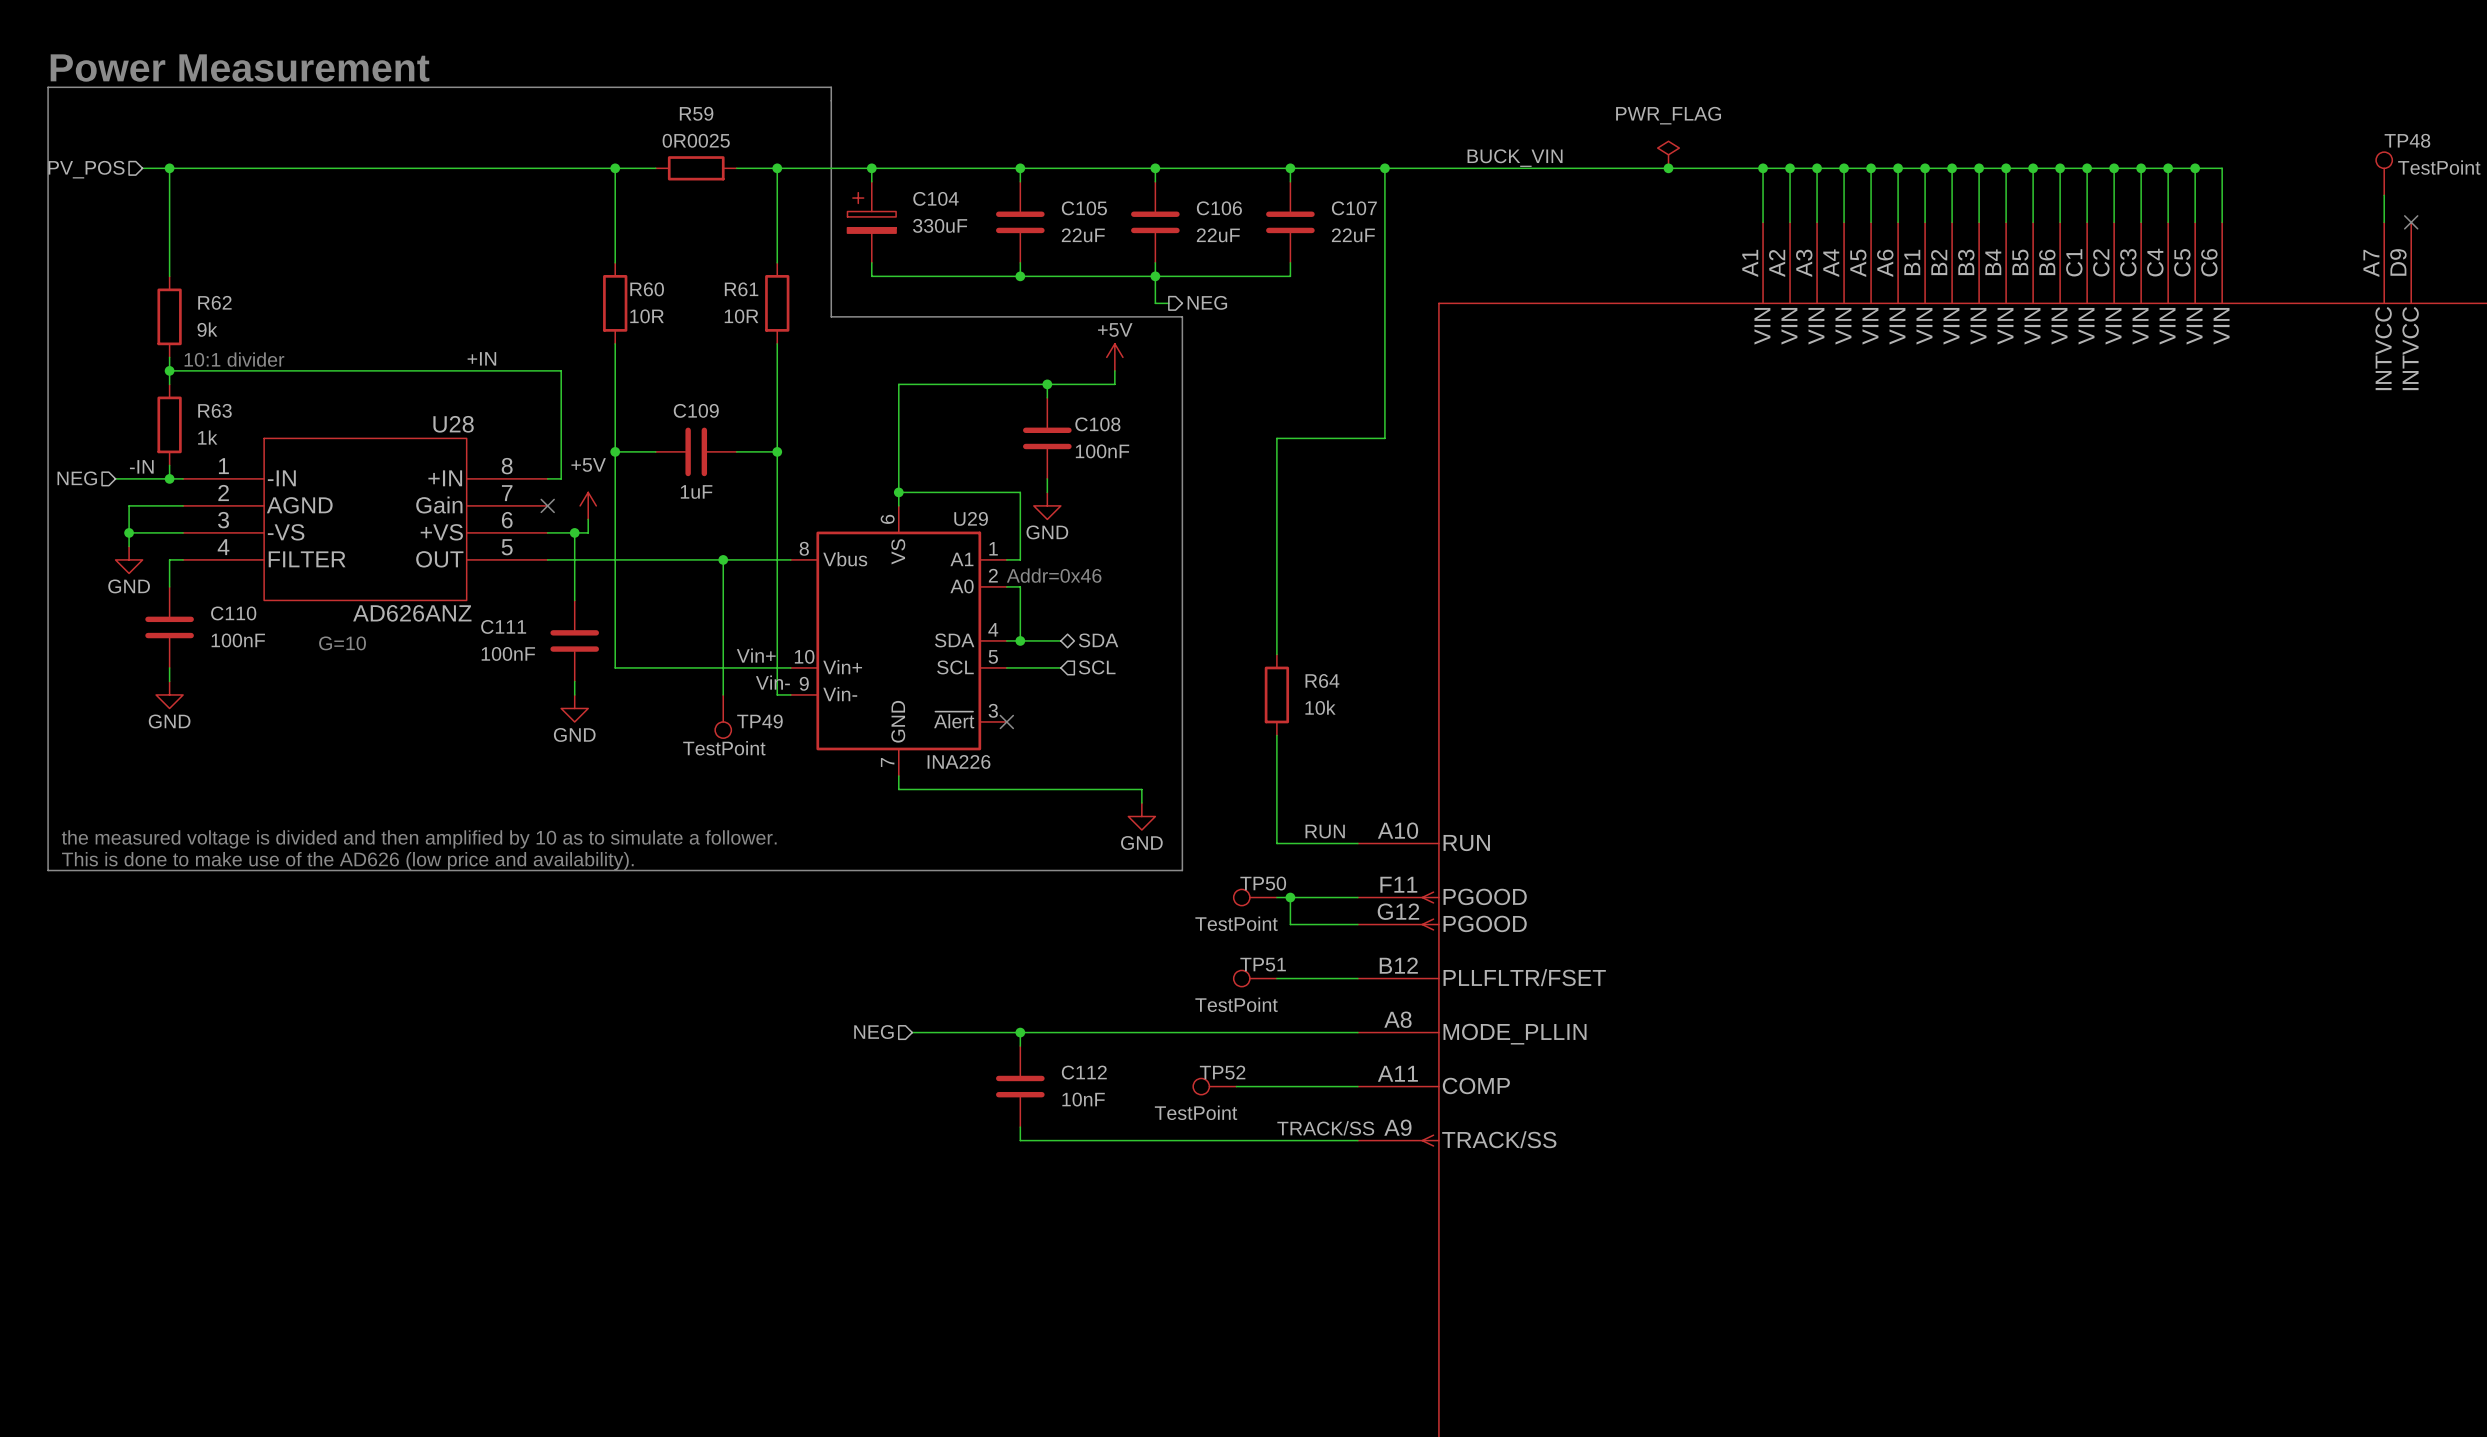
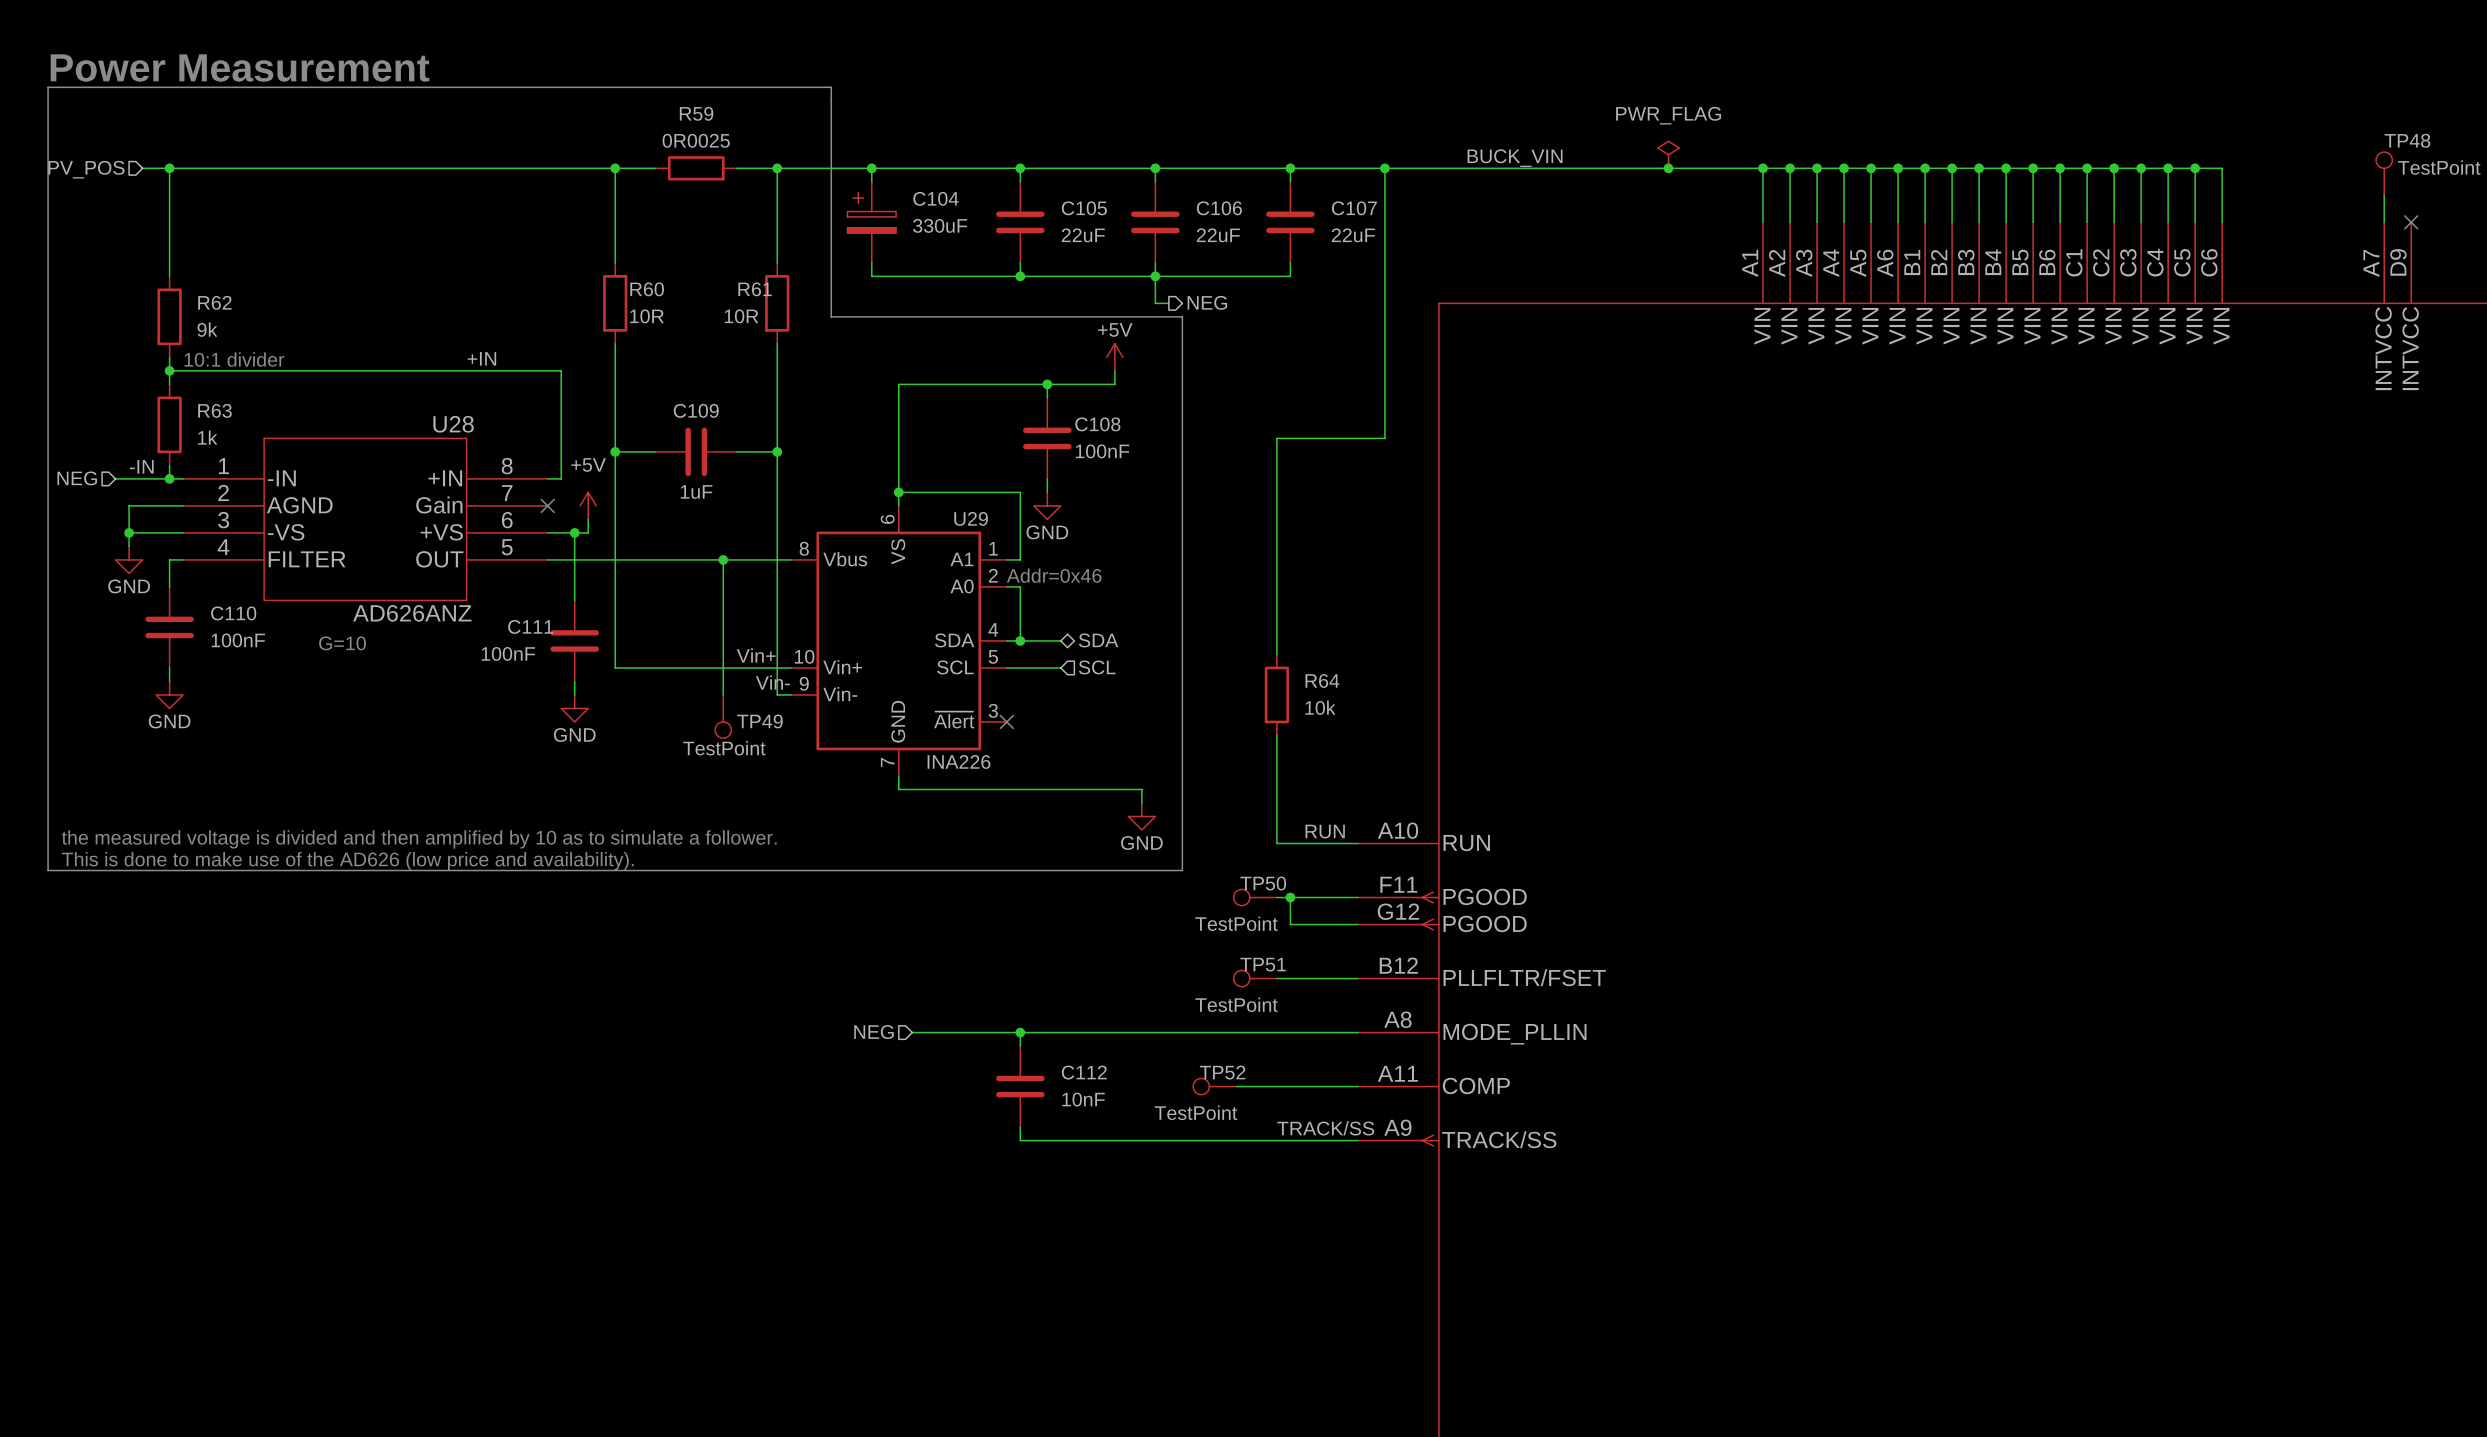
R61 name position: R61 (741, 289) -> R61 (755, 289)
C111 name position: C111 (503, 626) -> C111 (530, 626)

